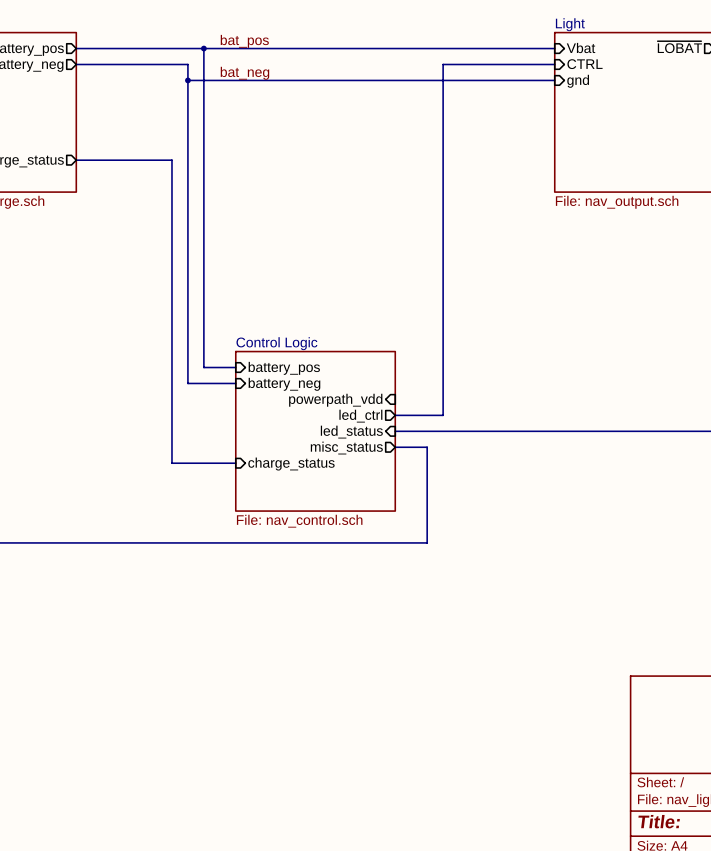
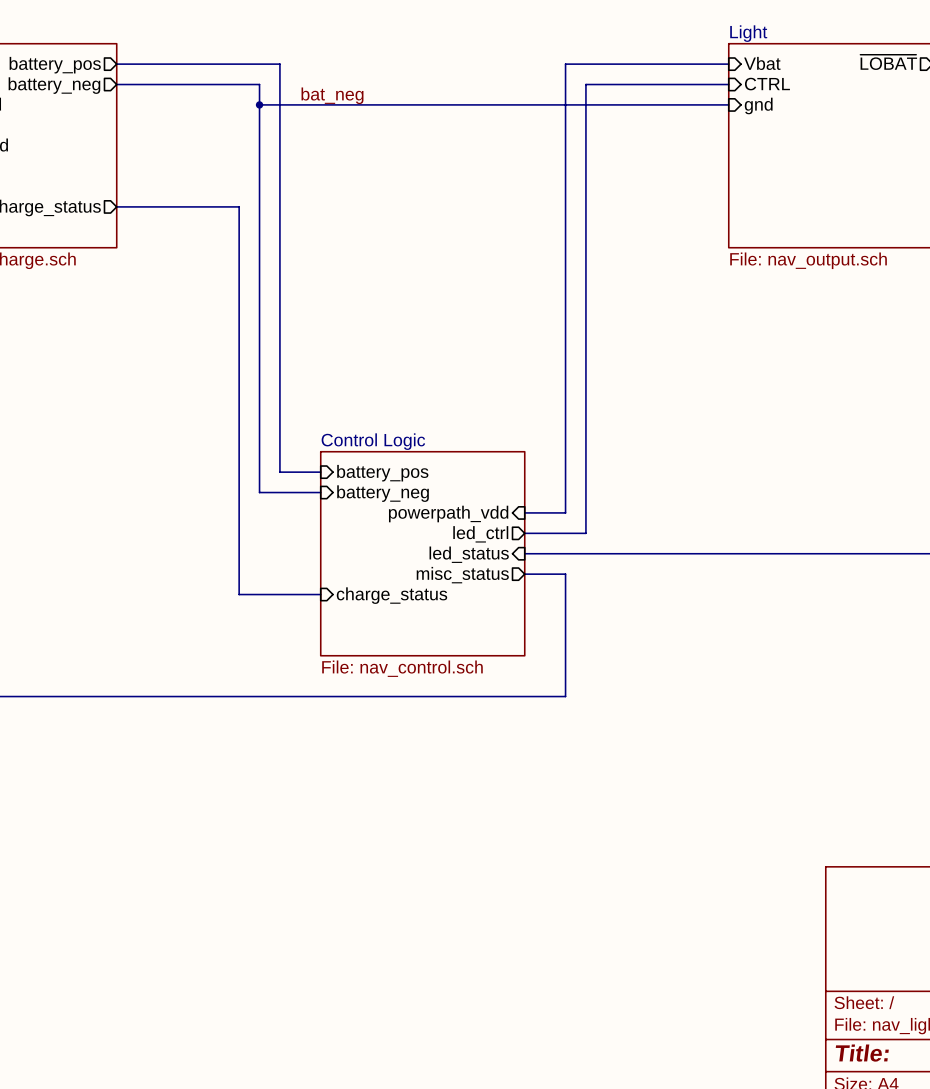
label: bat_pos (244, 41) -> none
wire: (203, 48) (427, 48) -> (524, 512) (565, 512) (565, 64)
junction: (203, 48) -> none

